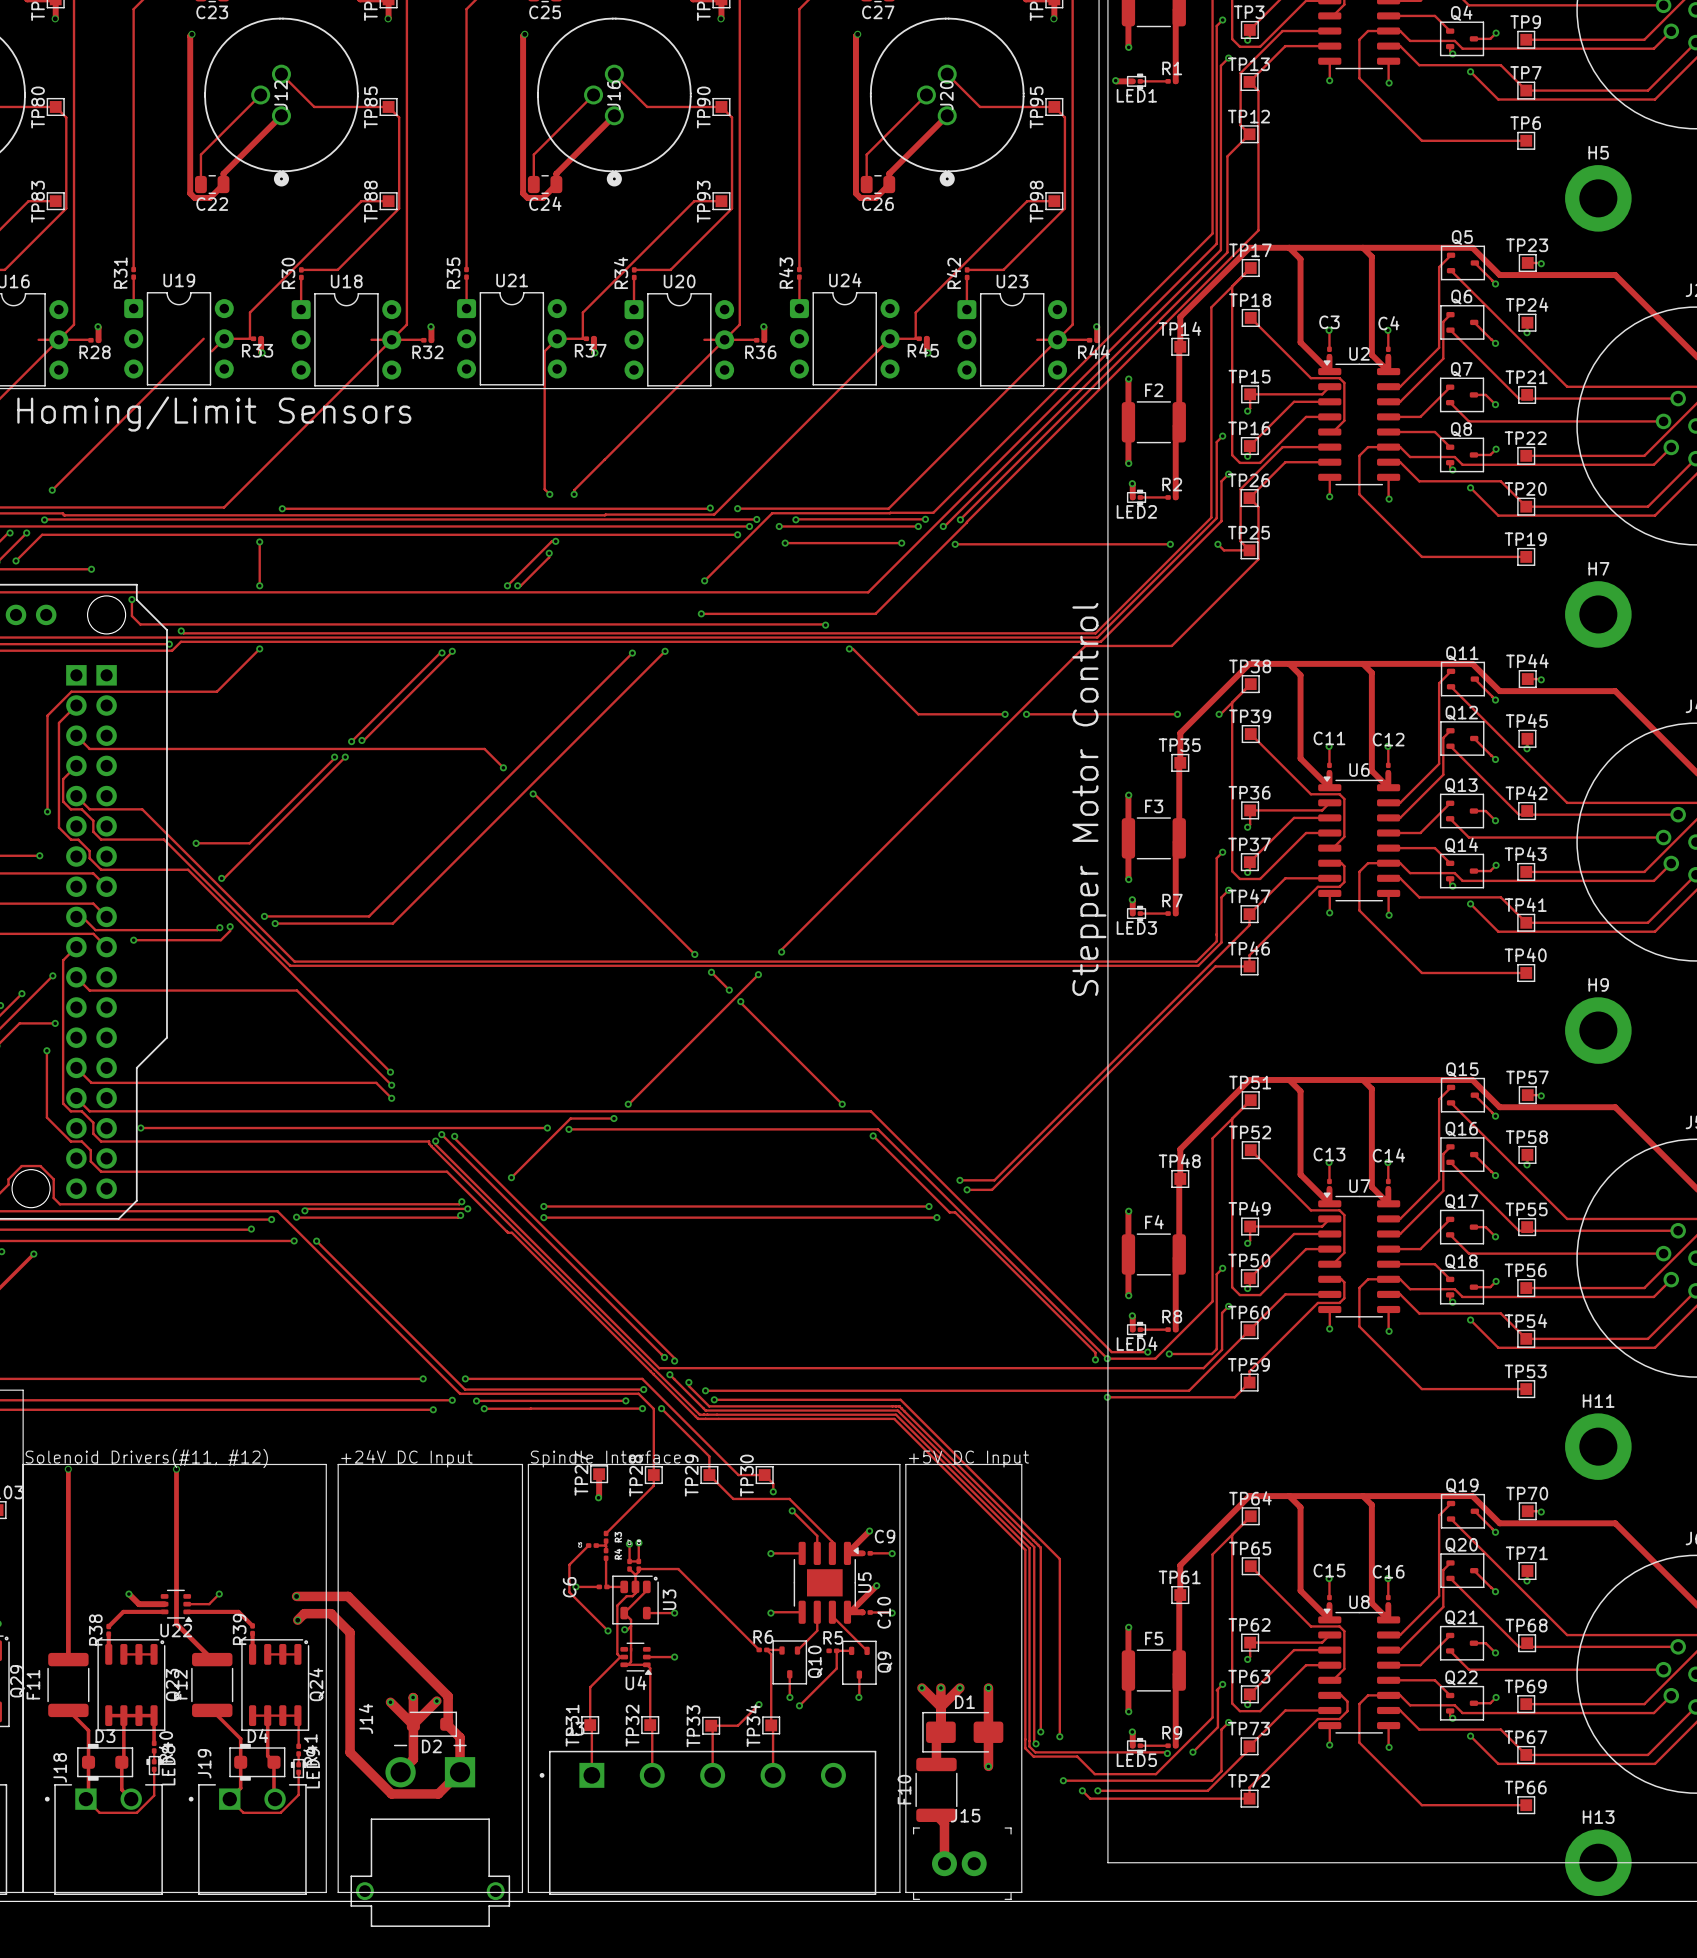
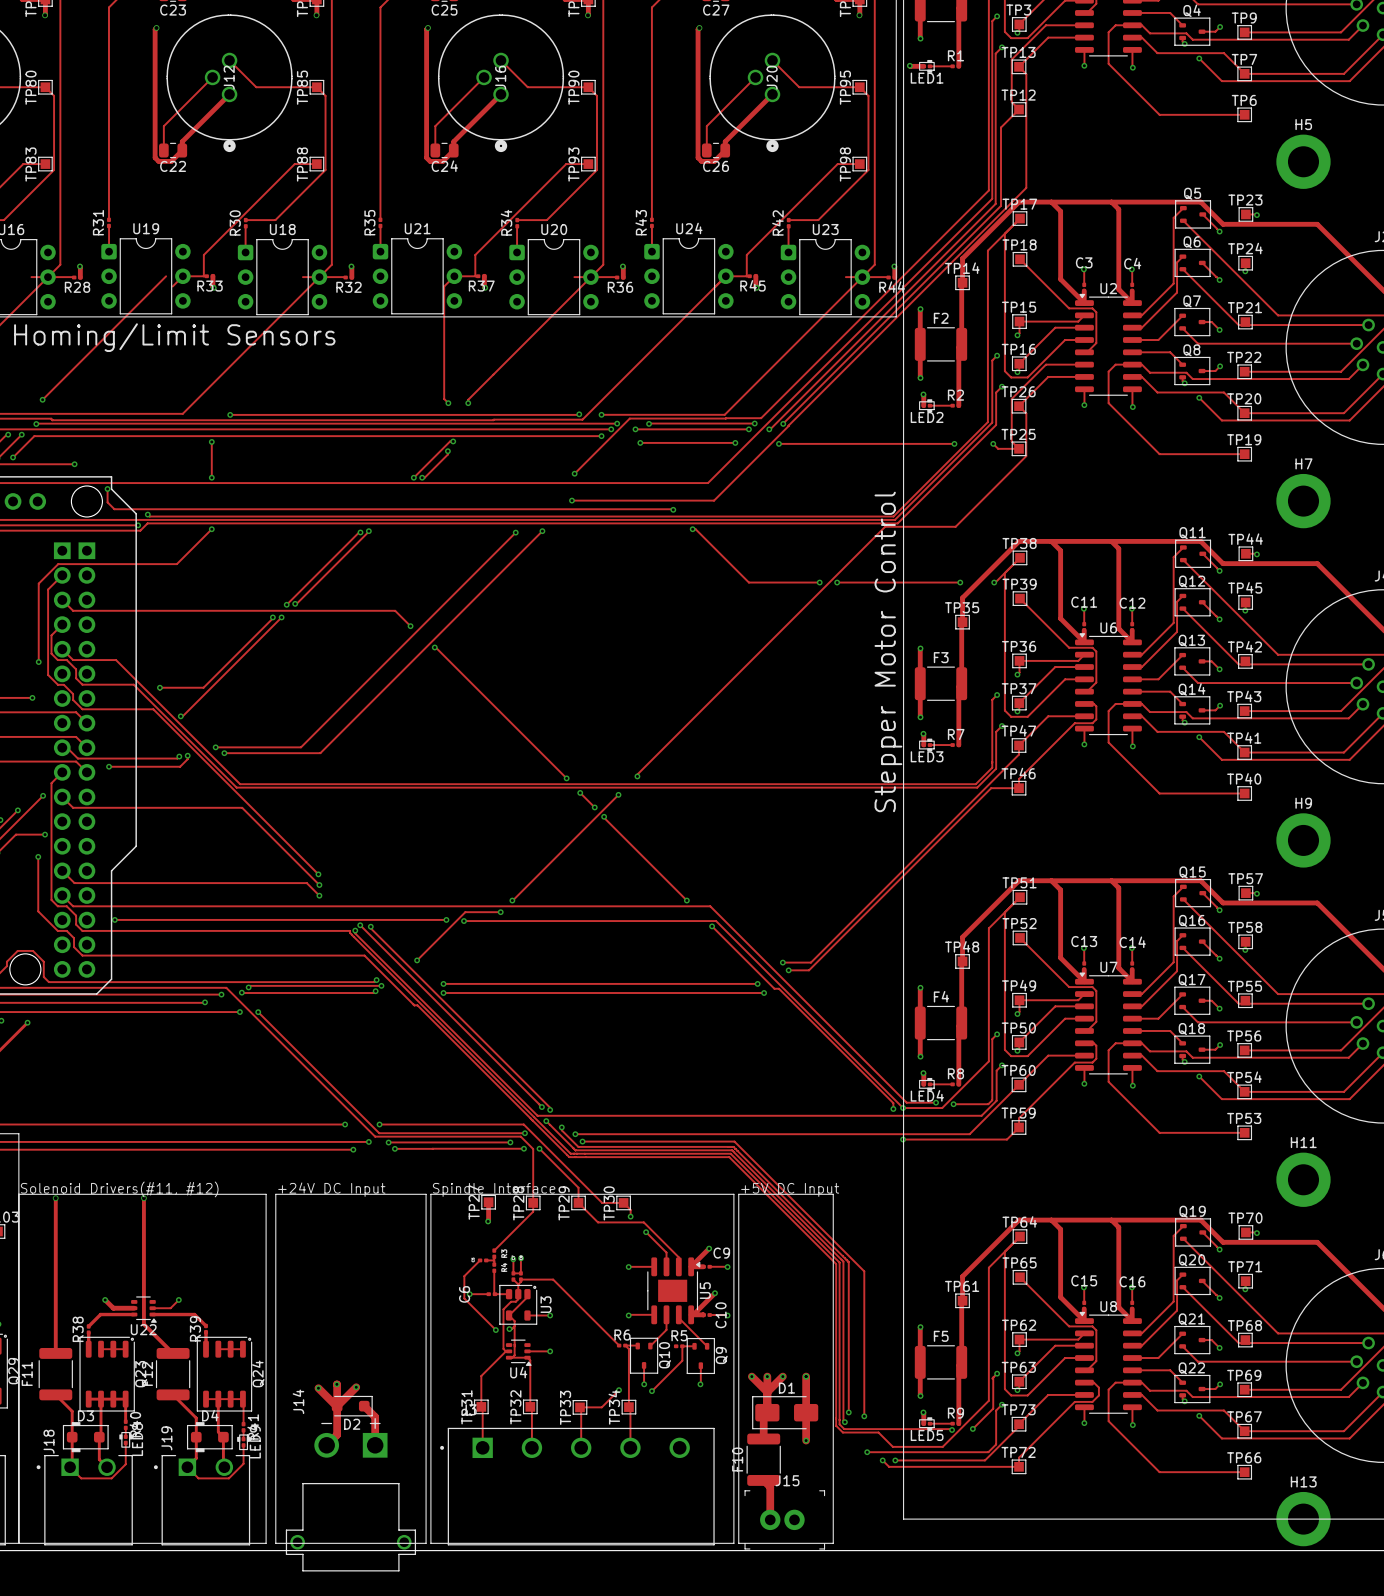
track: (296, 1596) (348, 1596) (448, 1696) (446, 1724) -> none
via: (296, 1596) -> none
track: (297, 1620) (304, 1613) (331, 1613) (350, 1632) (350, 1752) (391, 1793) (438, 1793) (460, 1772) -> none
via: (297, 1620) -> none

